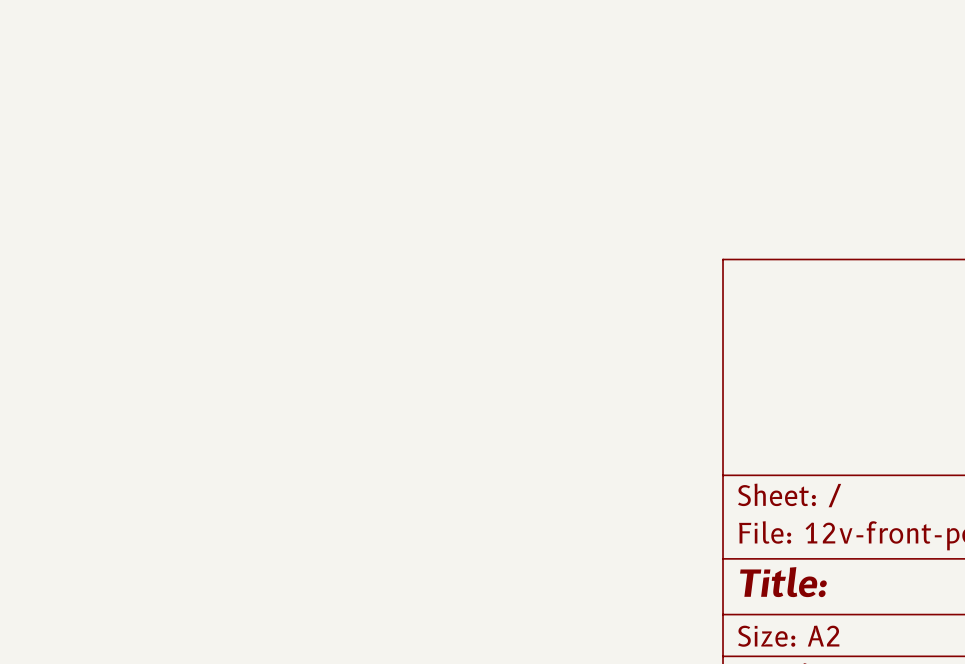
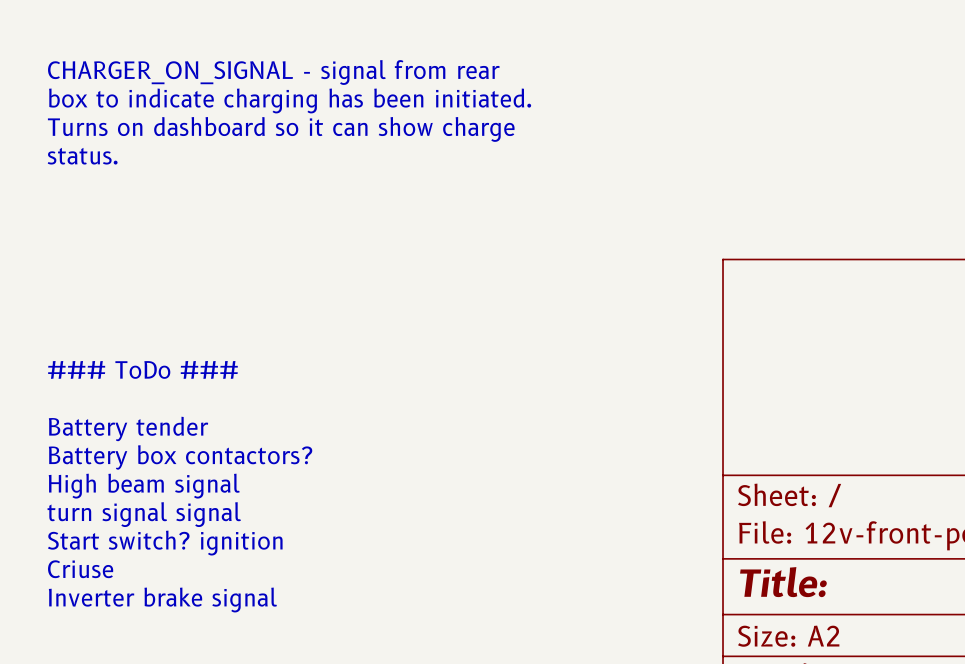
text: none -> CHARGER_ON_SIGNAL - signal from rear (273, 72)
text: none -> box to indicate charging has been initiated. (290, 100)
text: none -> Turns on dashboard so it can show charge (281, 129)
text: none -> status. (82, 156)
text: none -> ### ToDo ### (142, 369)
text: none -> Battery tender (128, 428)
text: none -> Battery box contactors? (180, 457)
text: none -> High beam signal (144, 486)
text: none -> turn signal signal (144, 514)
text: none -> Start switch? ignition (165, 543)
text: none -> Criuse (80, 569)
text: none -> Inverter brake signal (162, 600)

